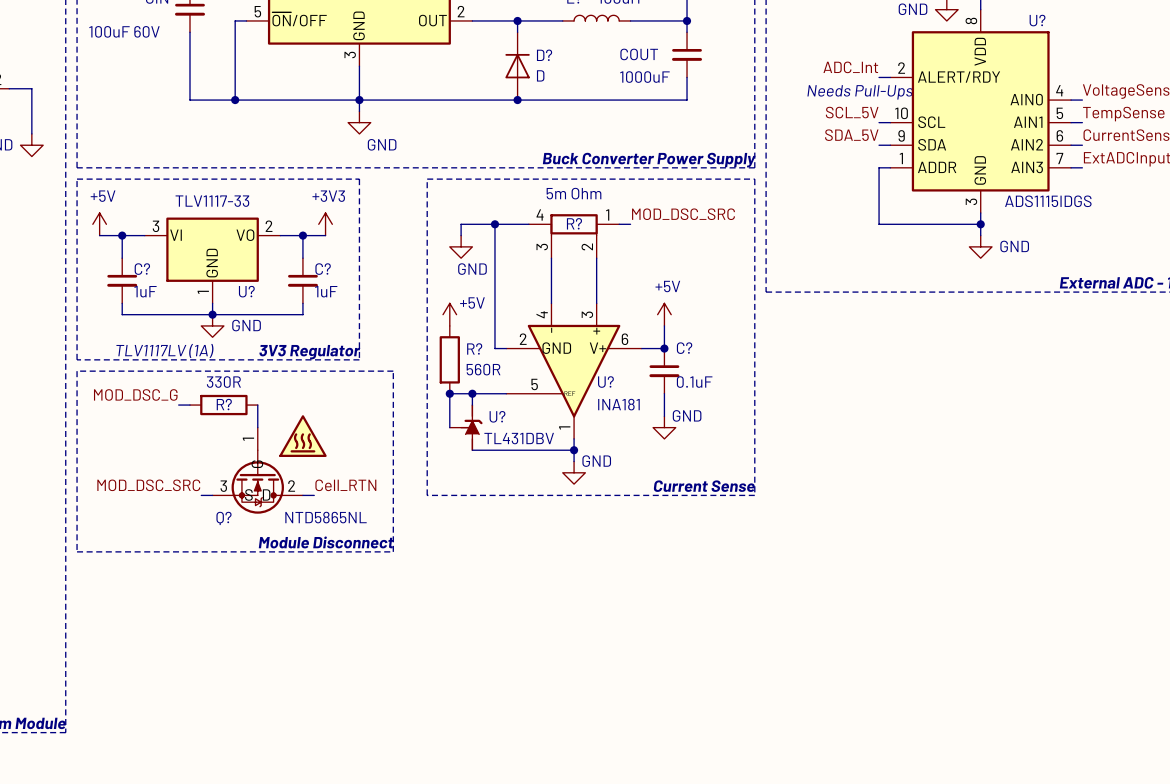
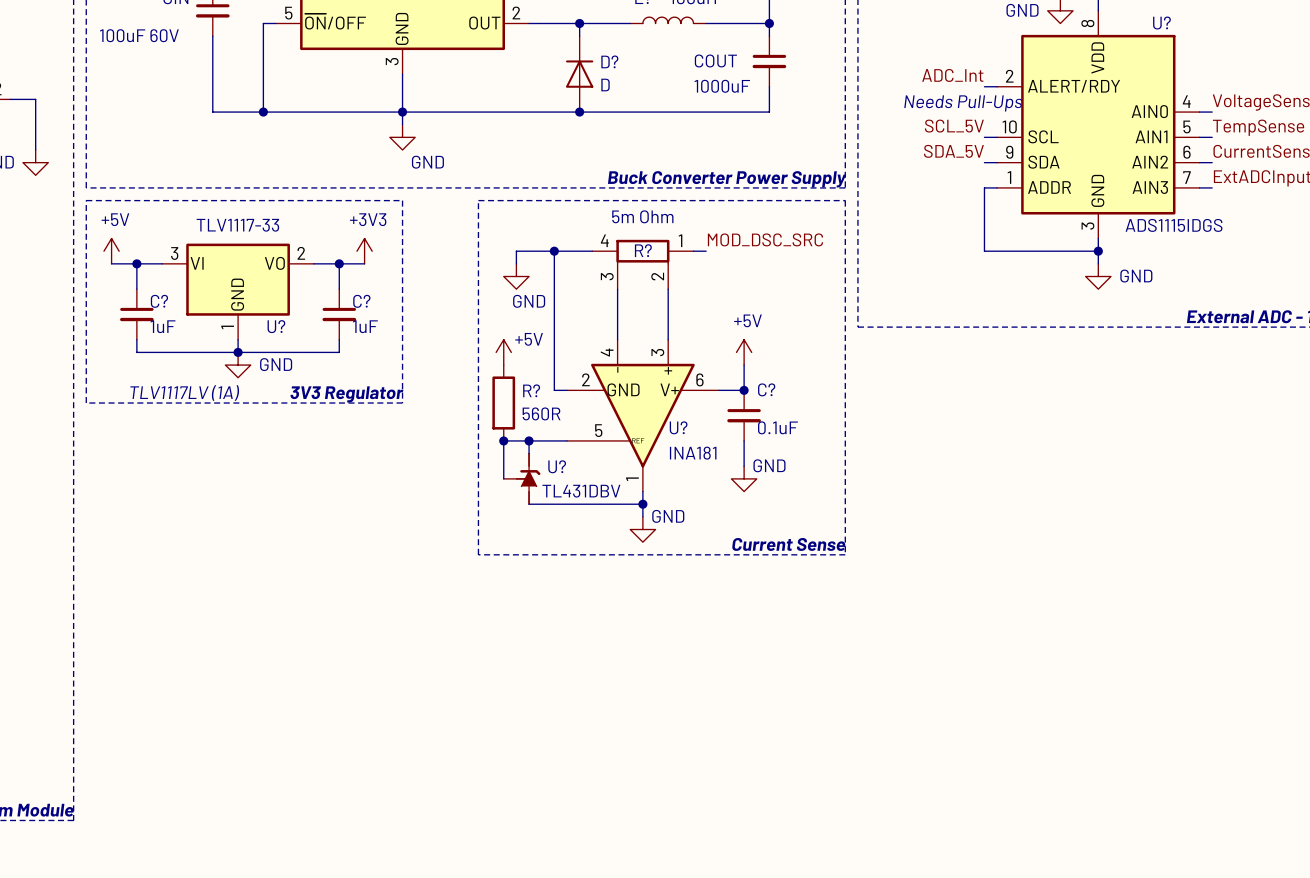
line: (77, 371) (77, 551) (393, 551) (393, 371) (77, 371) -> none
label: MOD_DSC_G (135, 394) -> none
wire: (178, 405) (189, 405) -> none
R?: 330R (223, 405) -> none
wire: (257, 405) (257, 427) -> none
power symbol: (302, 436) -> none
Q?: NTD5865NL (257, 470) -> none
label: MOD_DSC_SRC (148, 485) -> none
label: Cell_RTN (345, 485) -> none
wire: (201, 495) (212, 495) -> none
wire: (302, 495) (314, 495) -> none
text: Module Disconnect (326, 542) -> none

